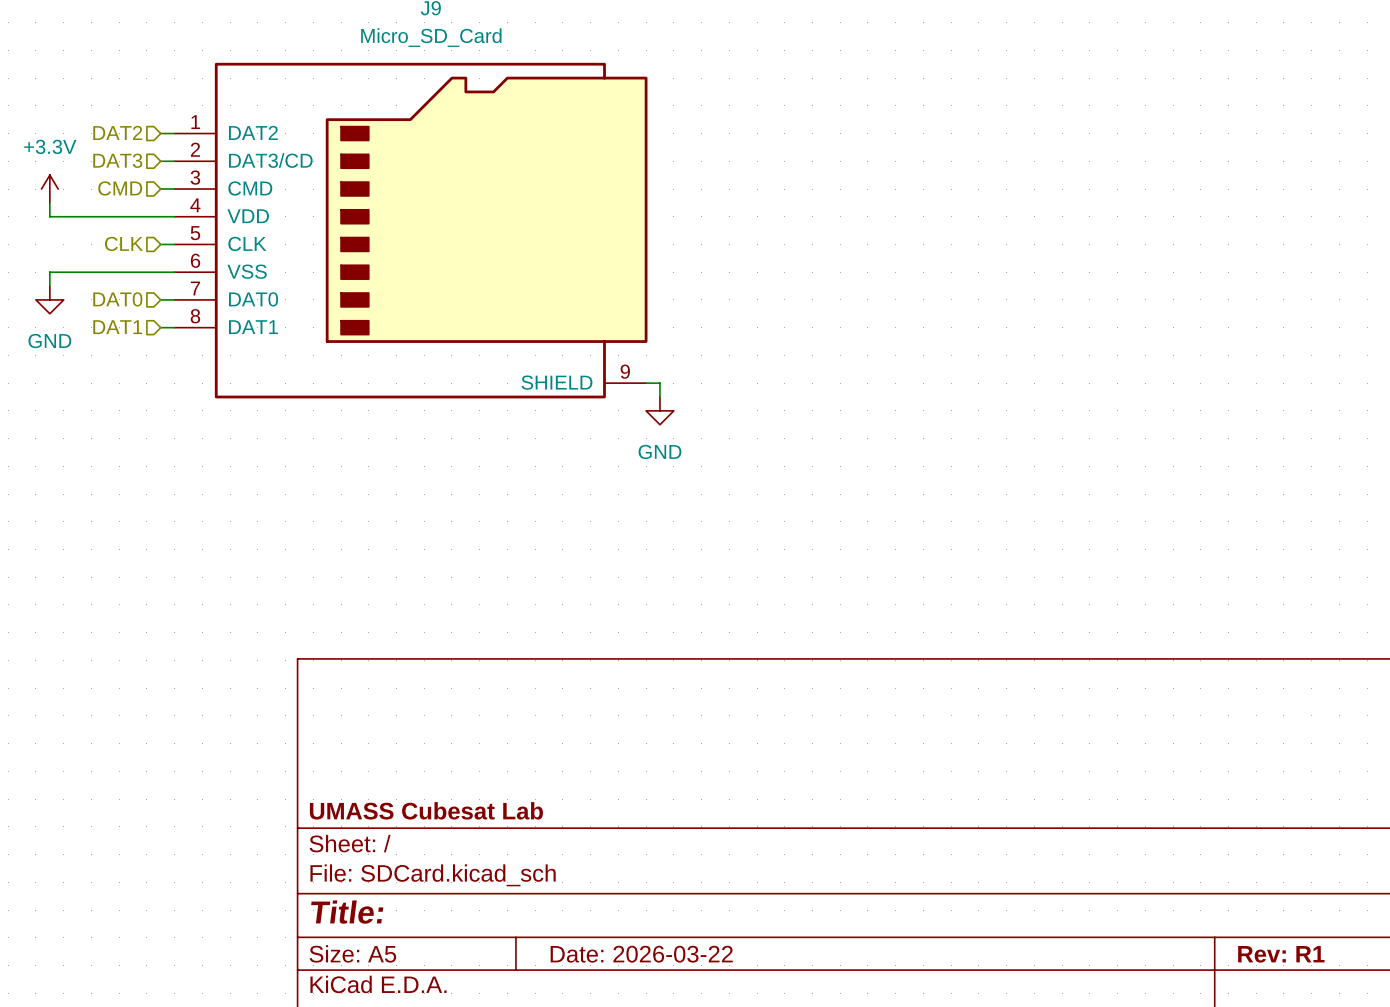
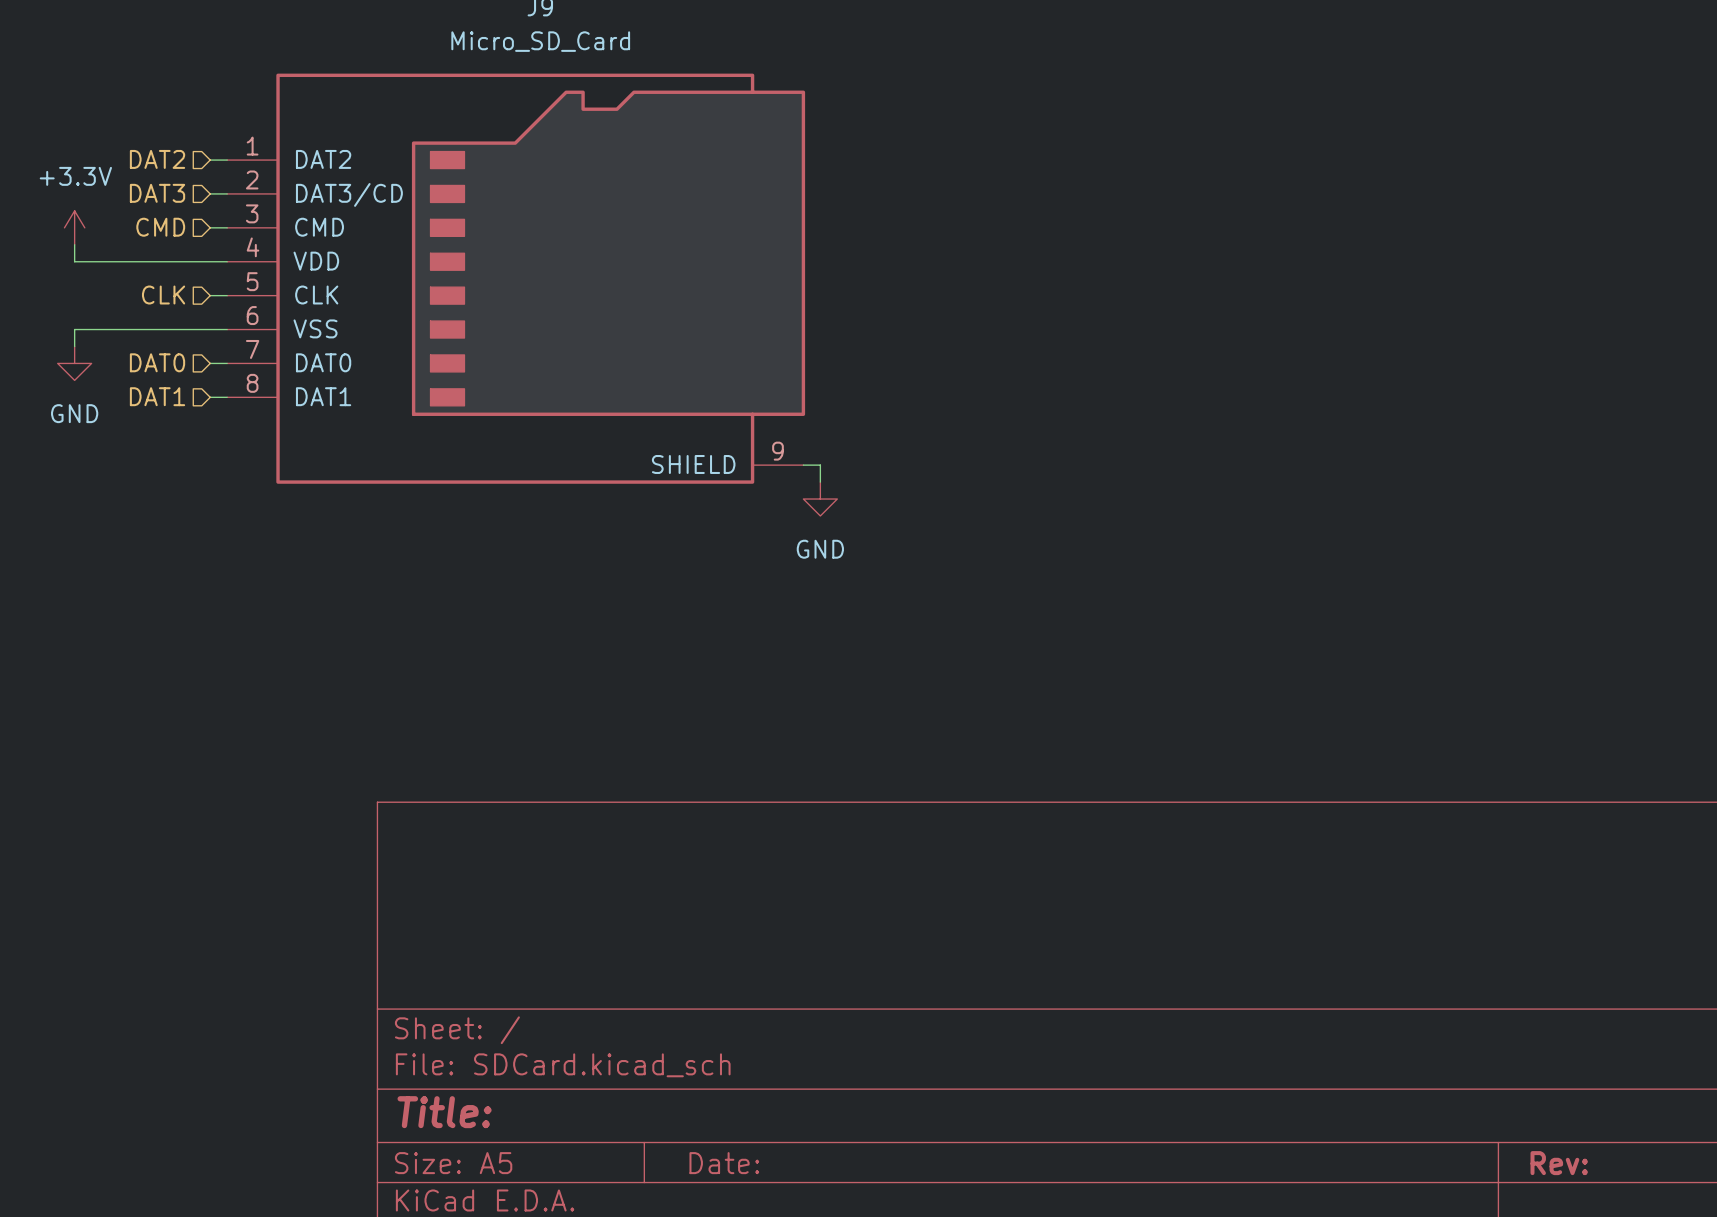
title block: UMASS Cubesat Lab (426, 810) -> none
title block: Date: 2026-03-22 (641, 954) -> Date: (724, 1163)
title block: Rev: R1 (1281, 954) -> Rev: (1559, 1163)

